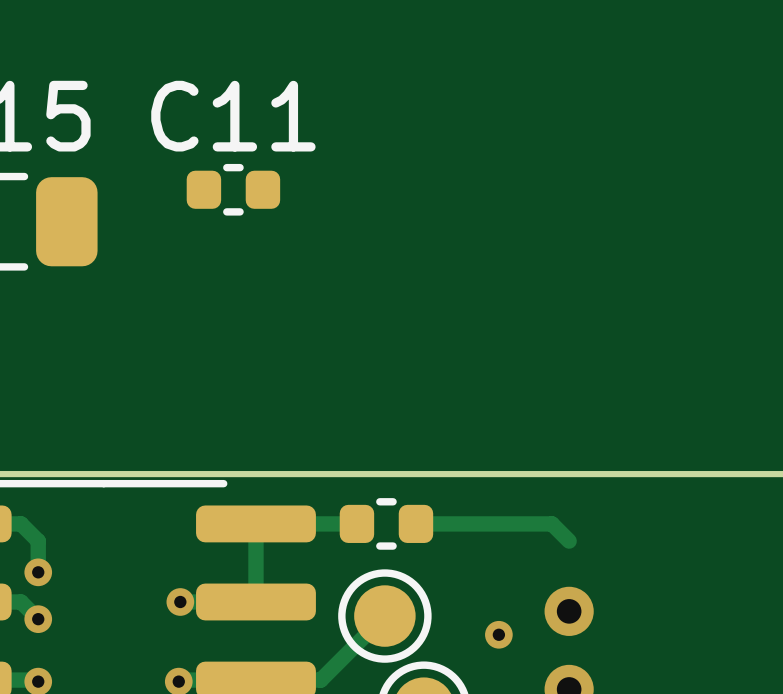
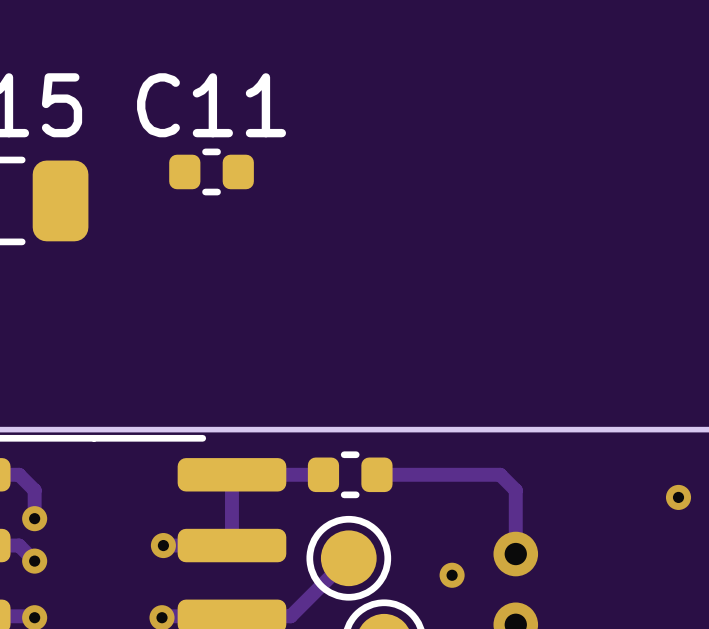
track: none -> (515, 490) (515, 554)
via: none -> (678, 497)

